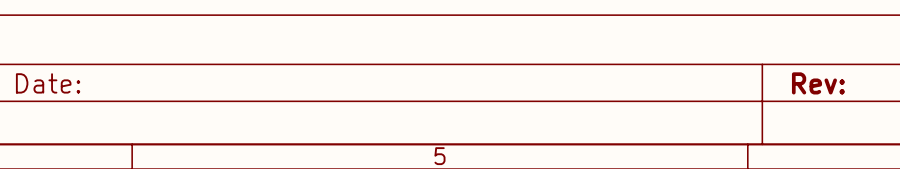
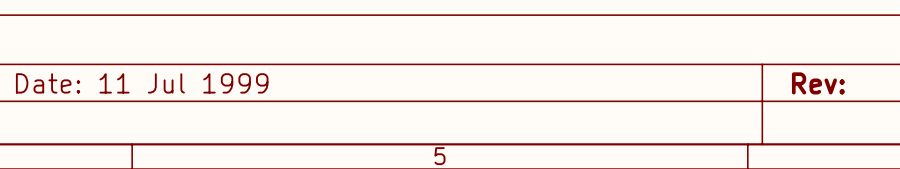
title block: Date: (48, 83) -> Date: 11 Jul 1999 (142, 83)

